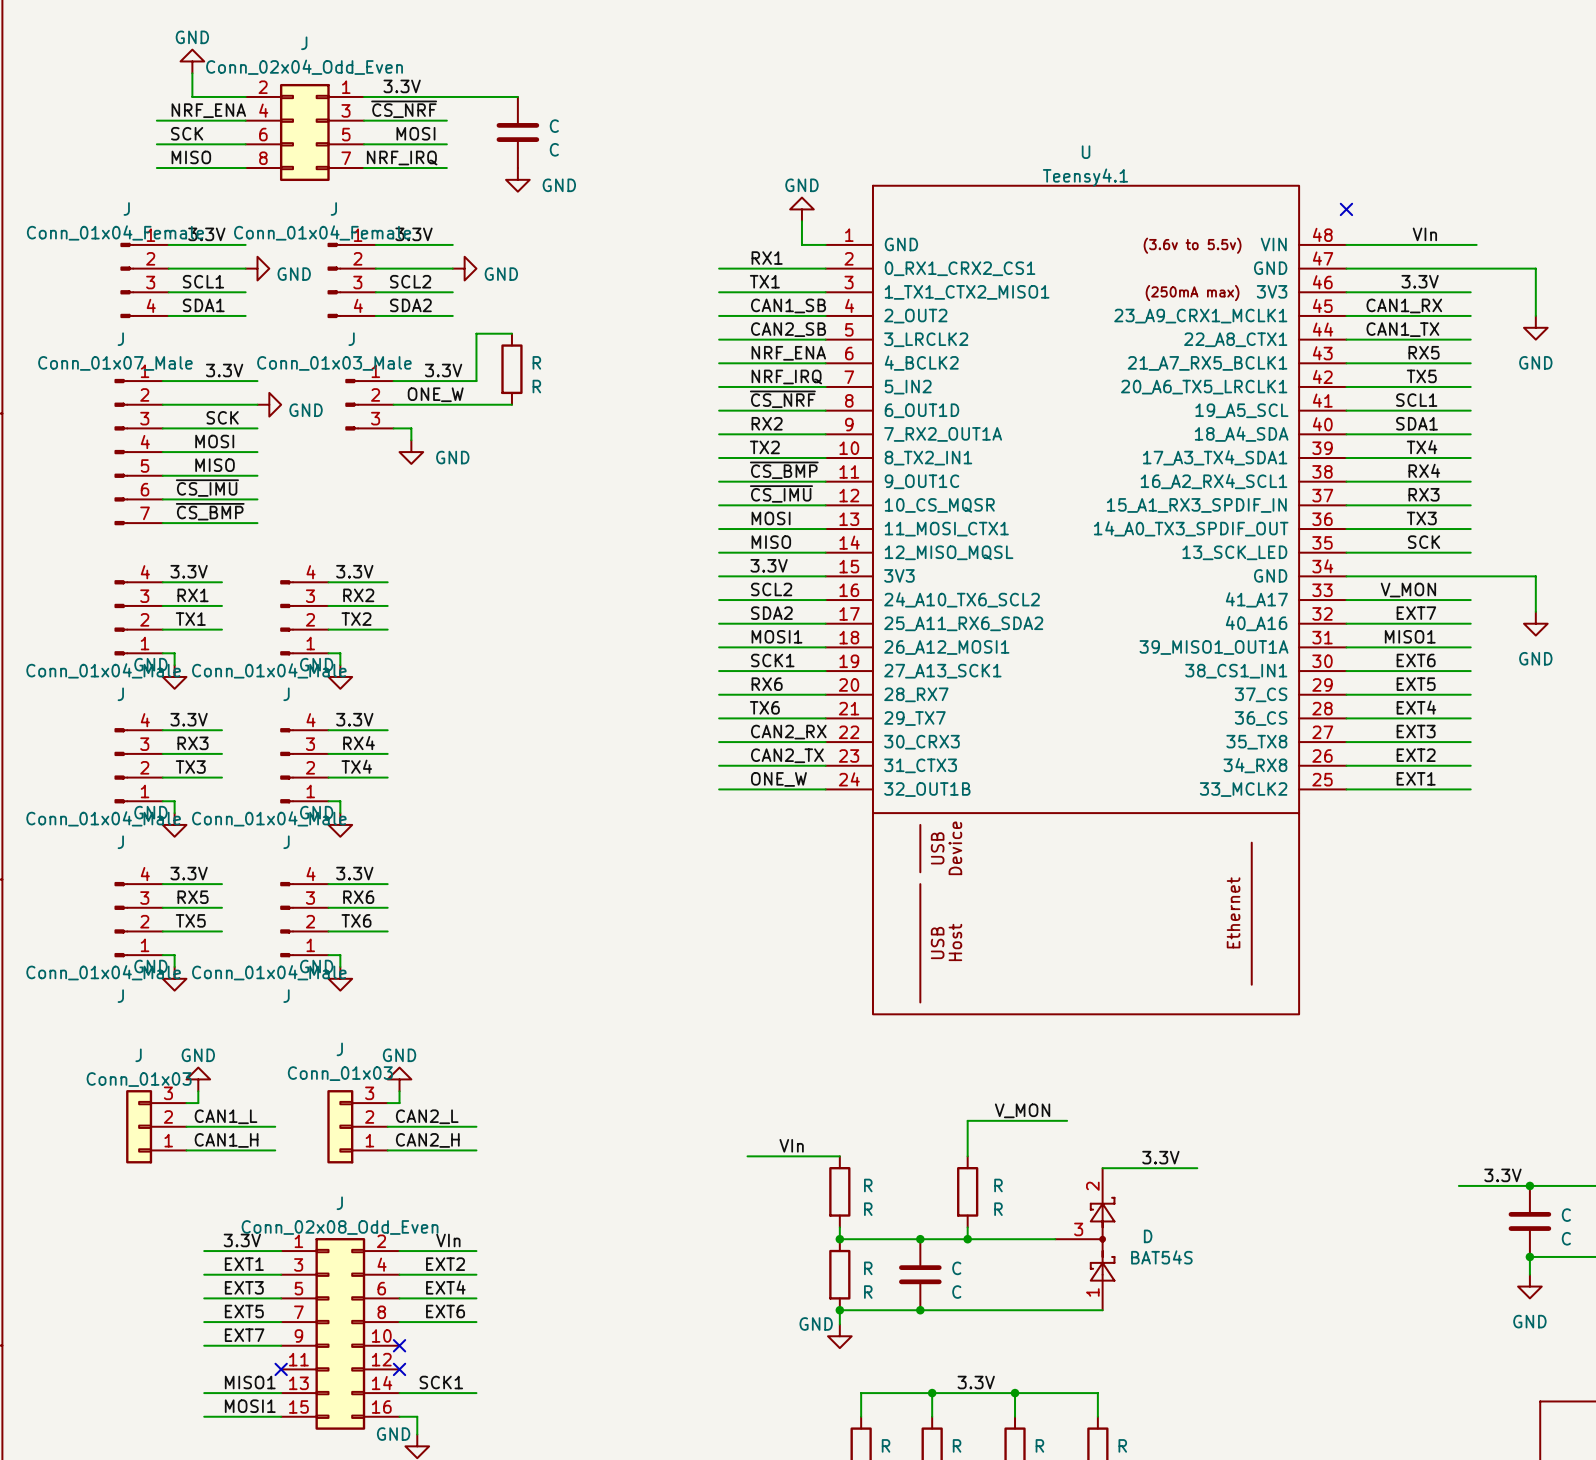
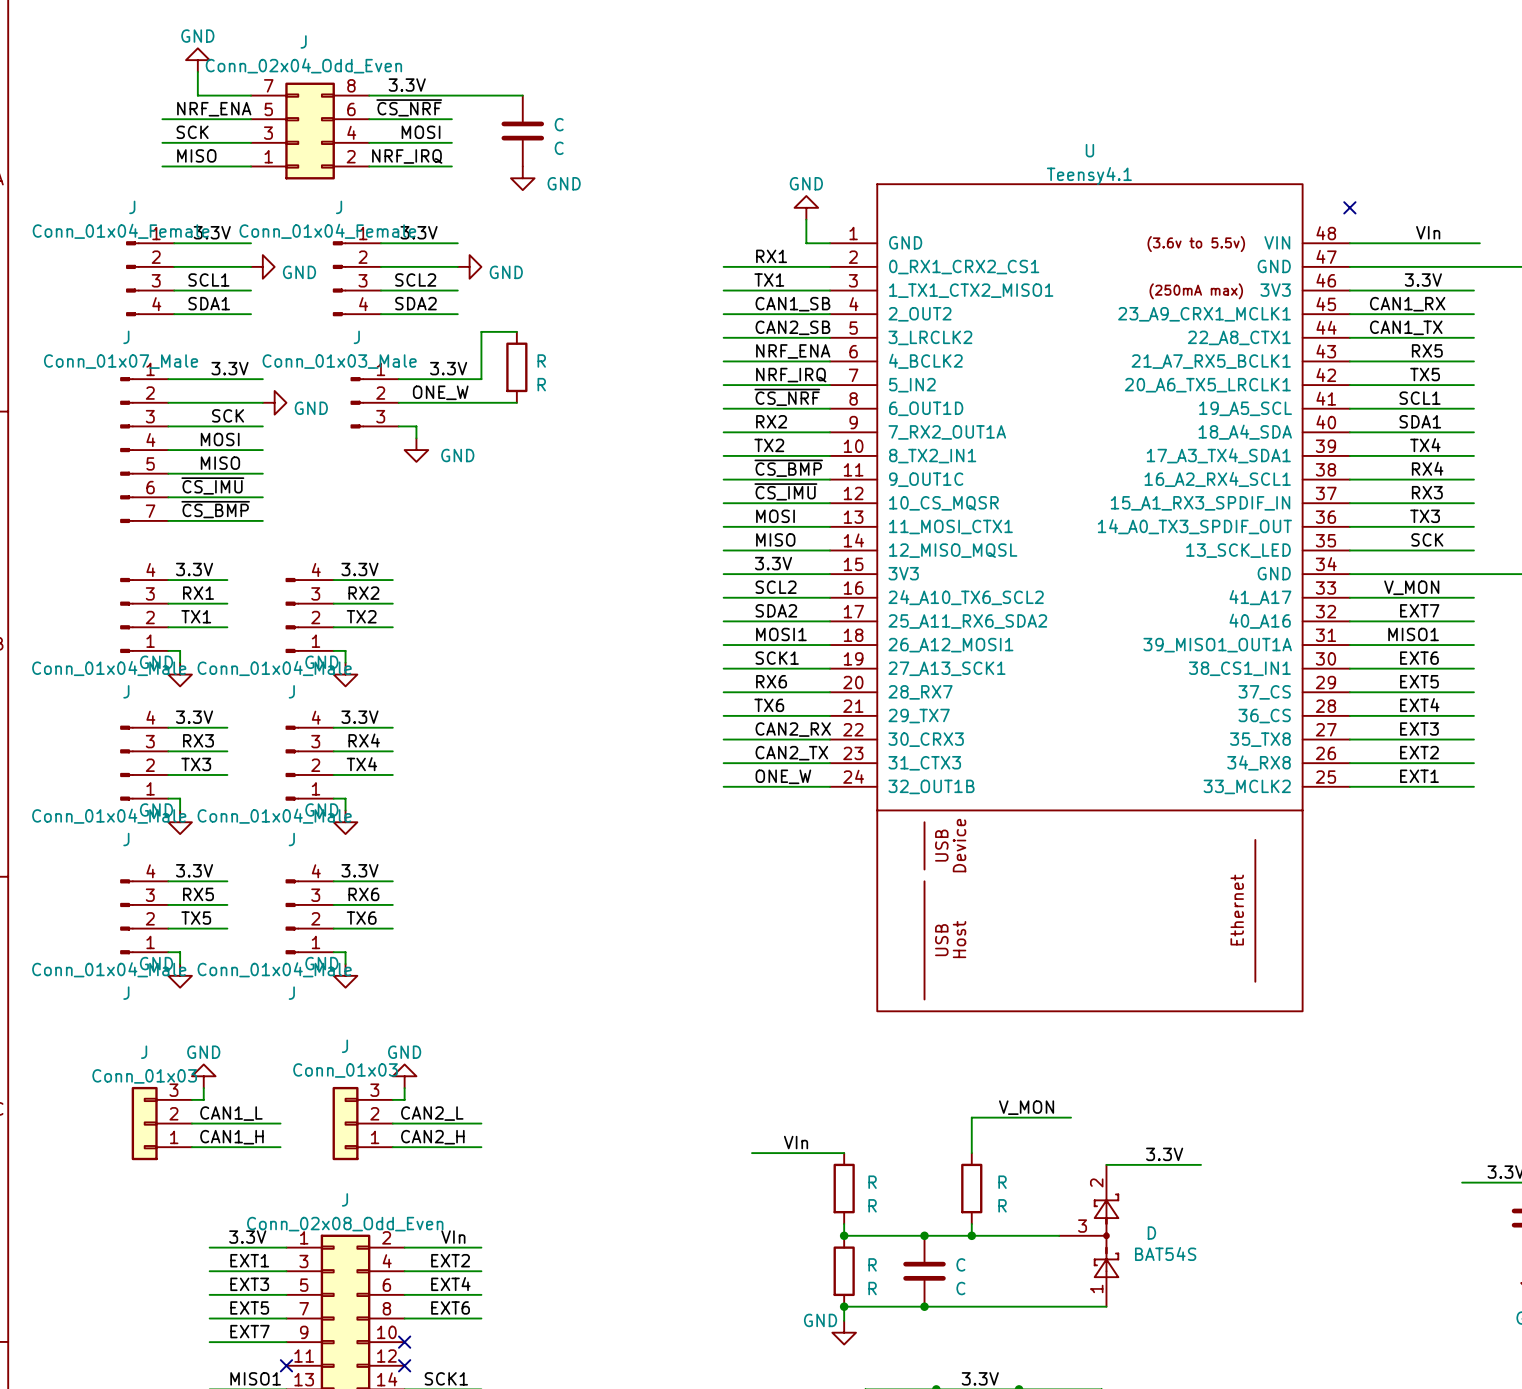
J rotation: 0° (304, 132) -> 180° (310, 131)

